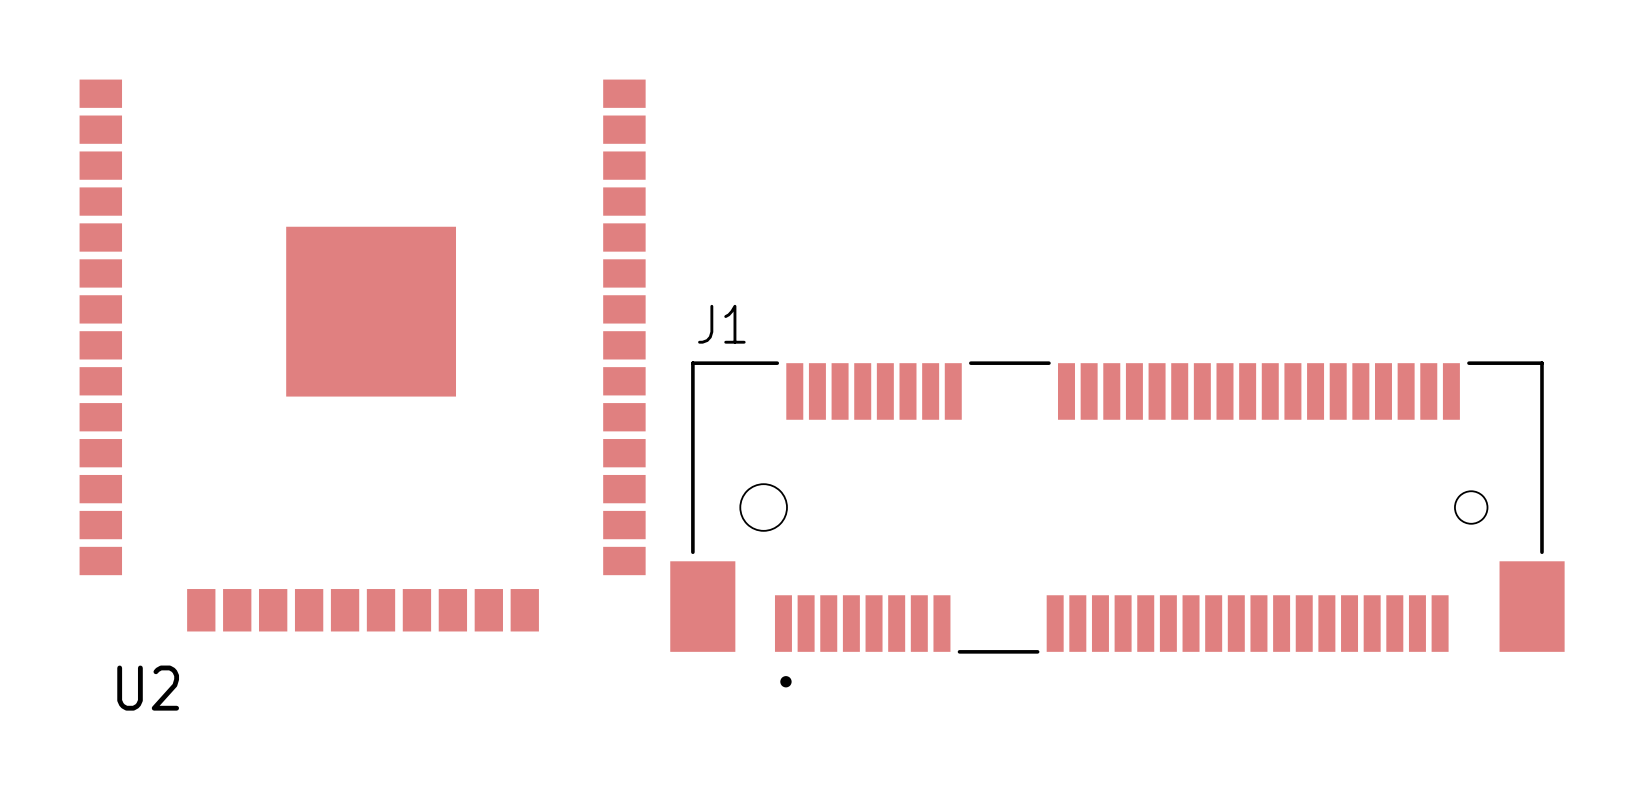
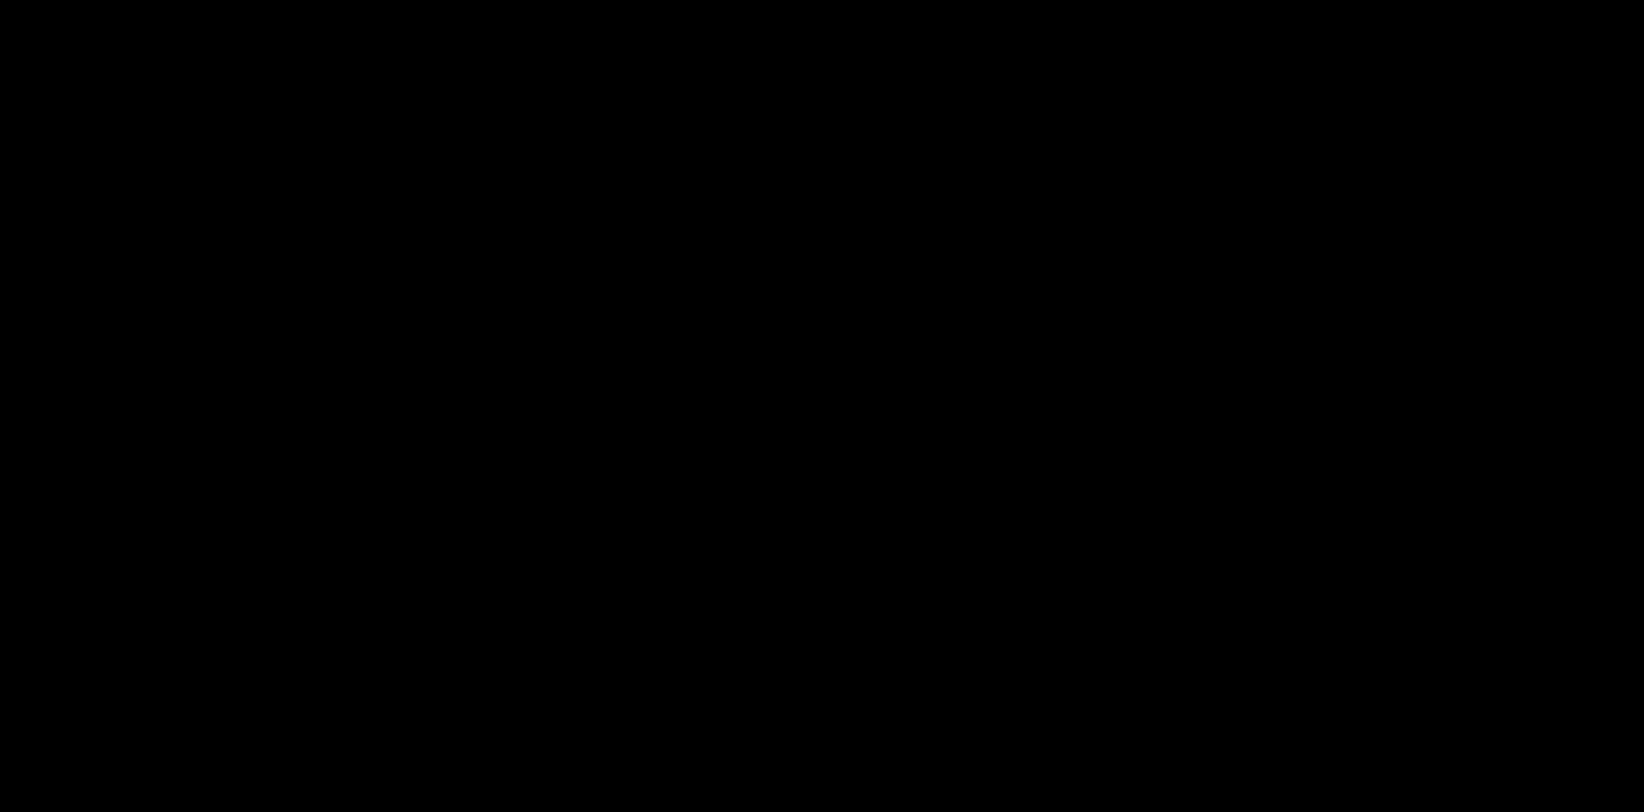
U2: (362, 355) -> none
J1: (1117, 524) -> none

